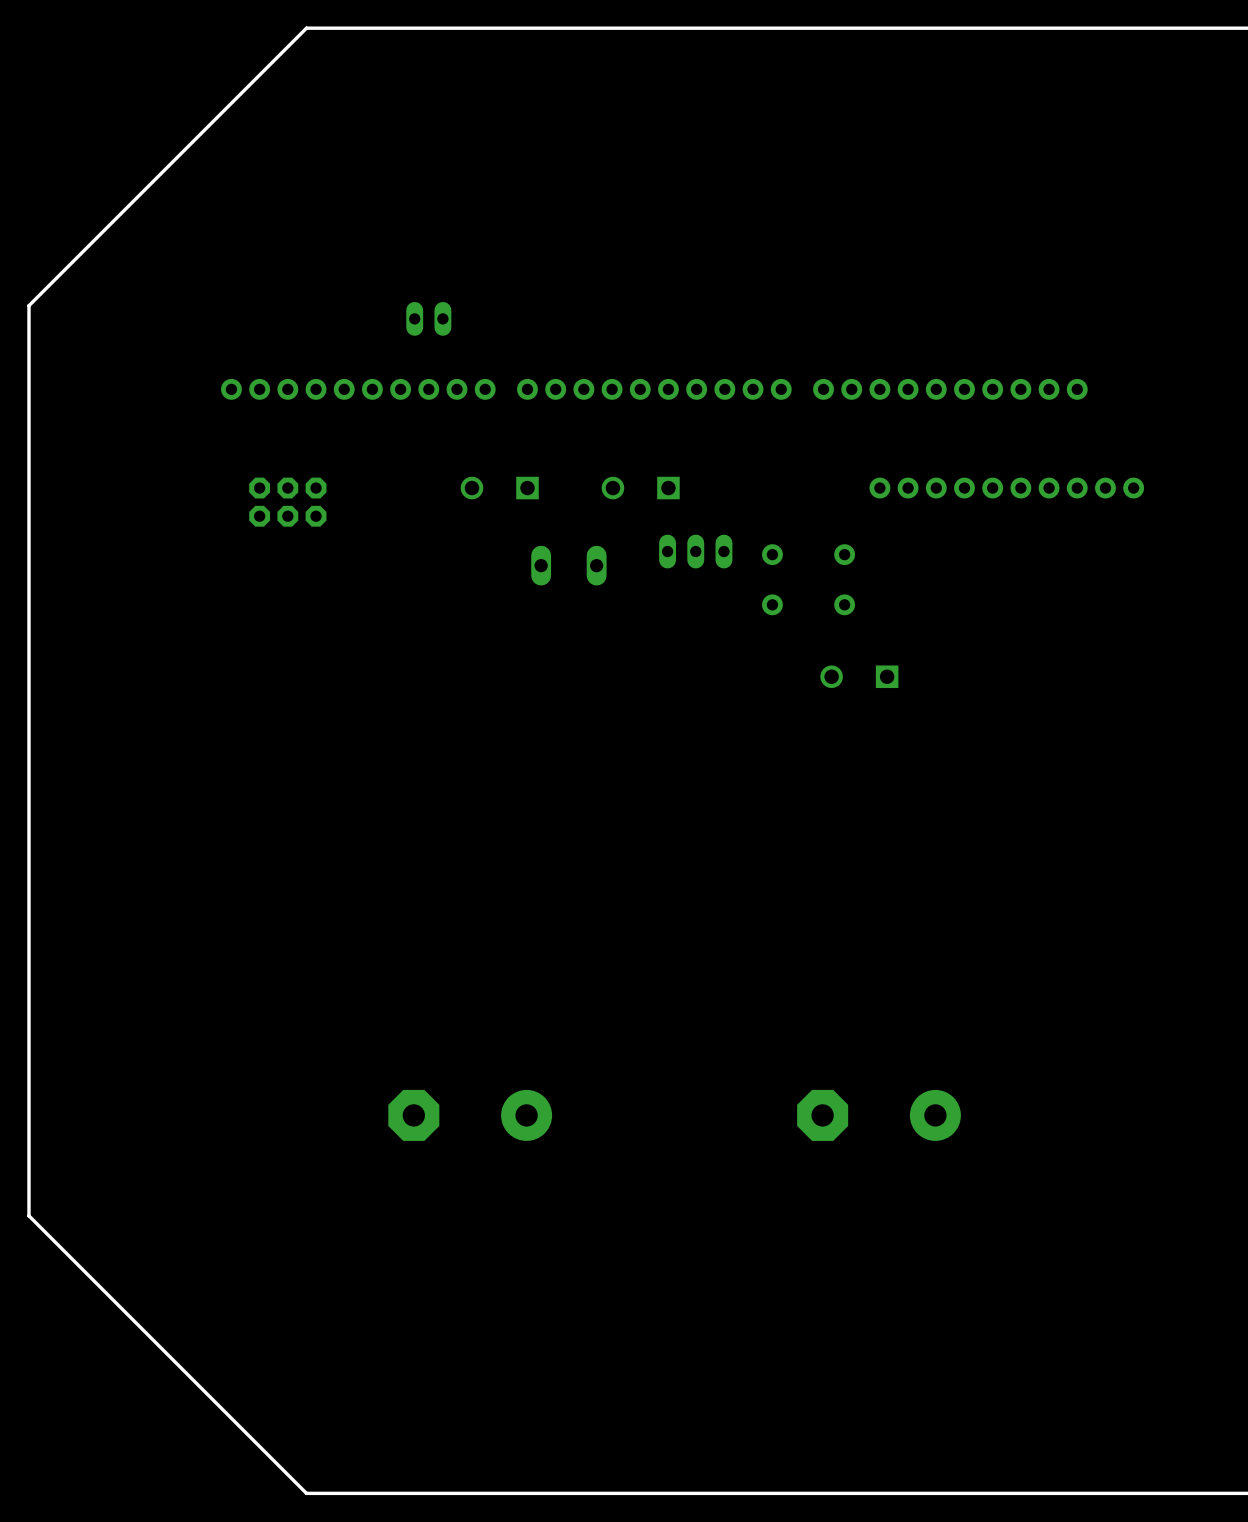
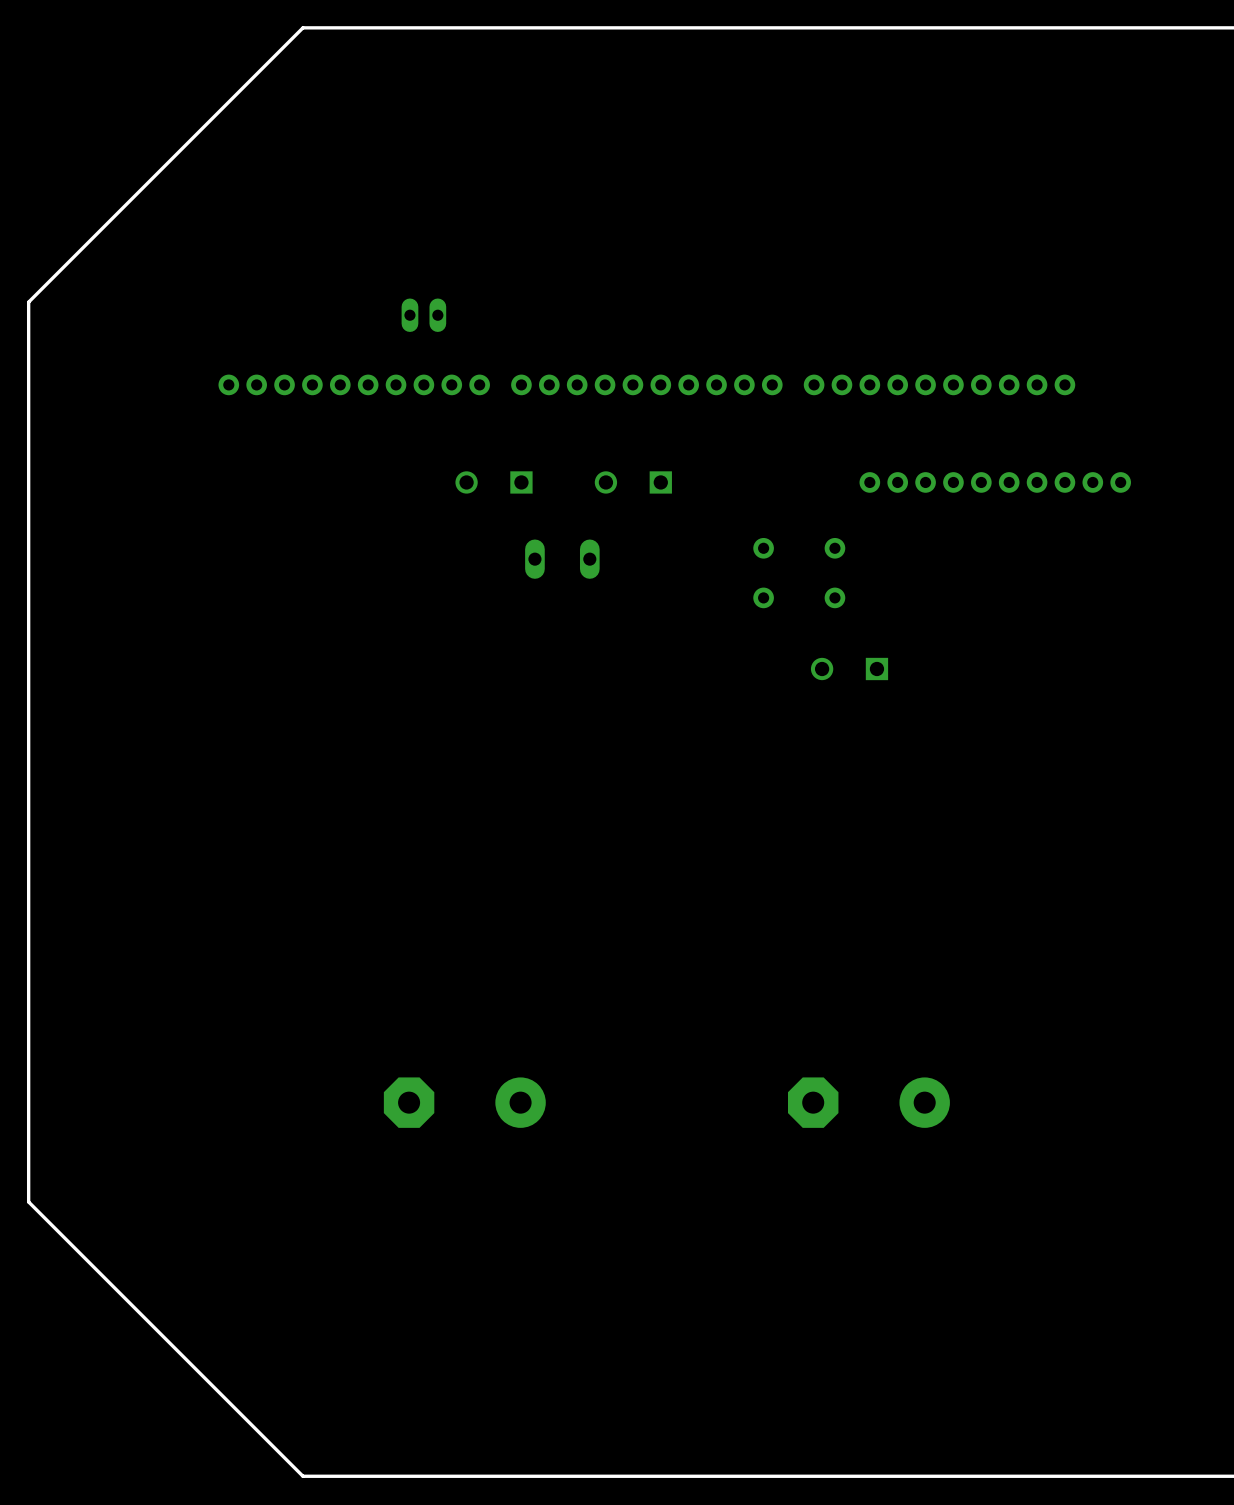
part: (287, 502) -> none
part: (695, 551) -> none

